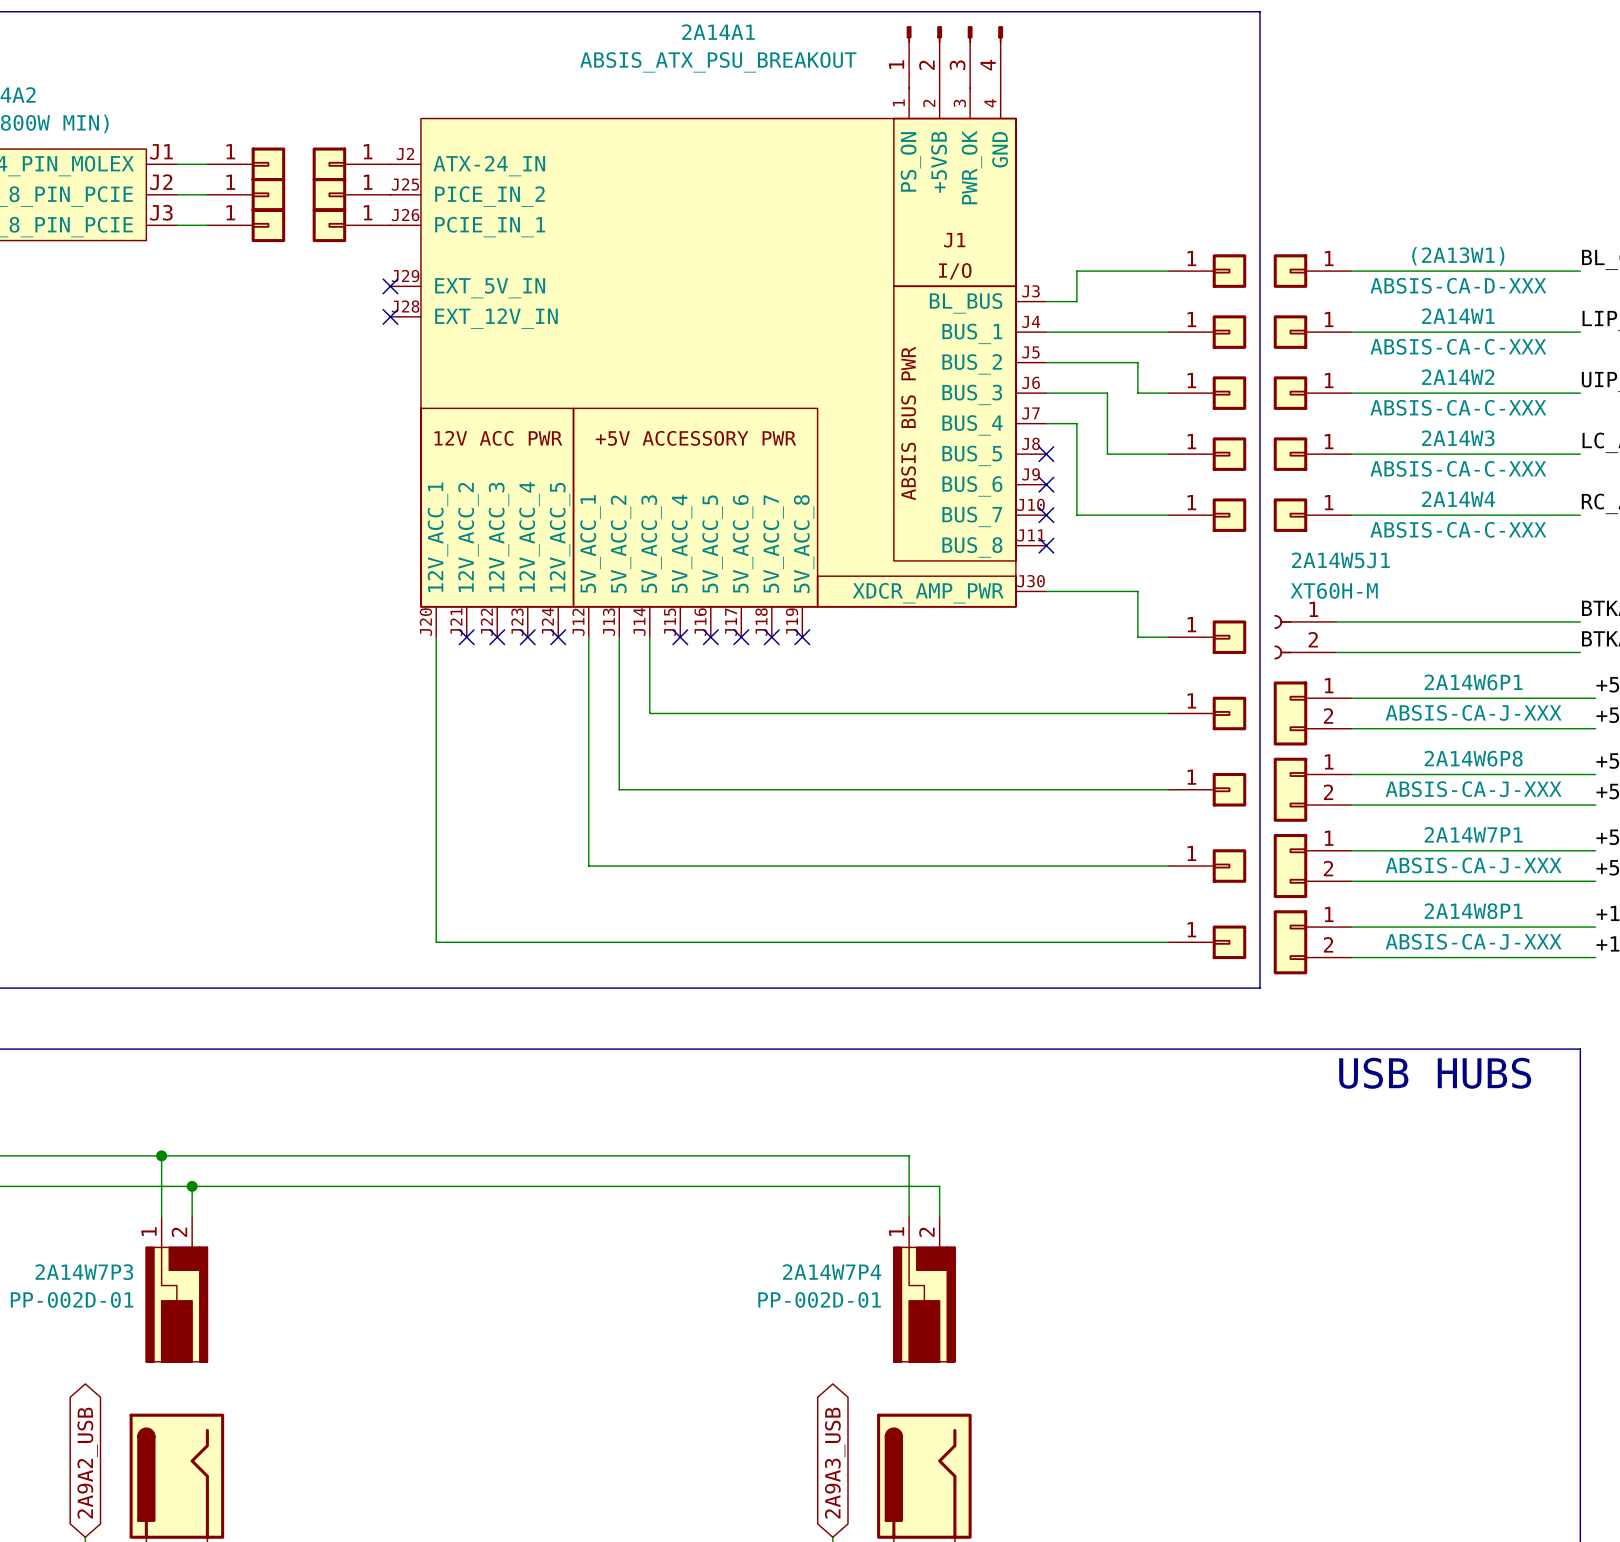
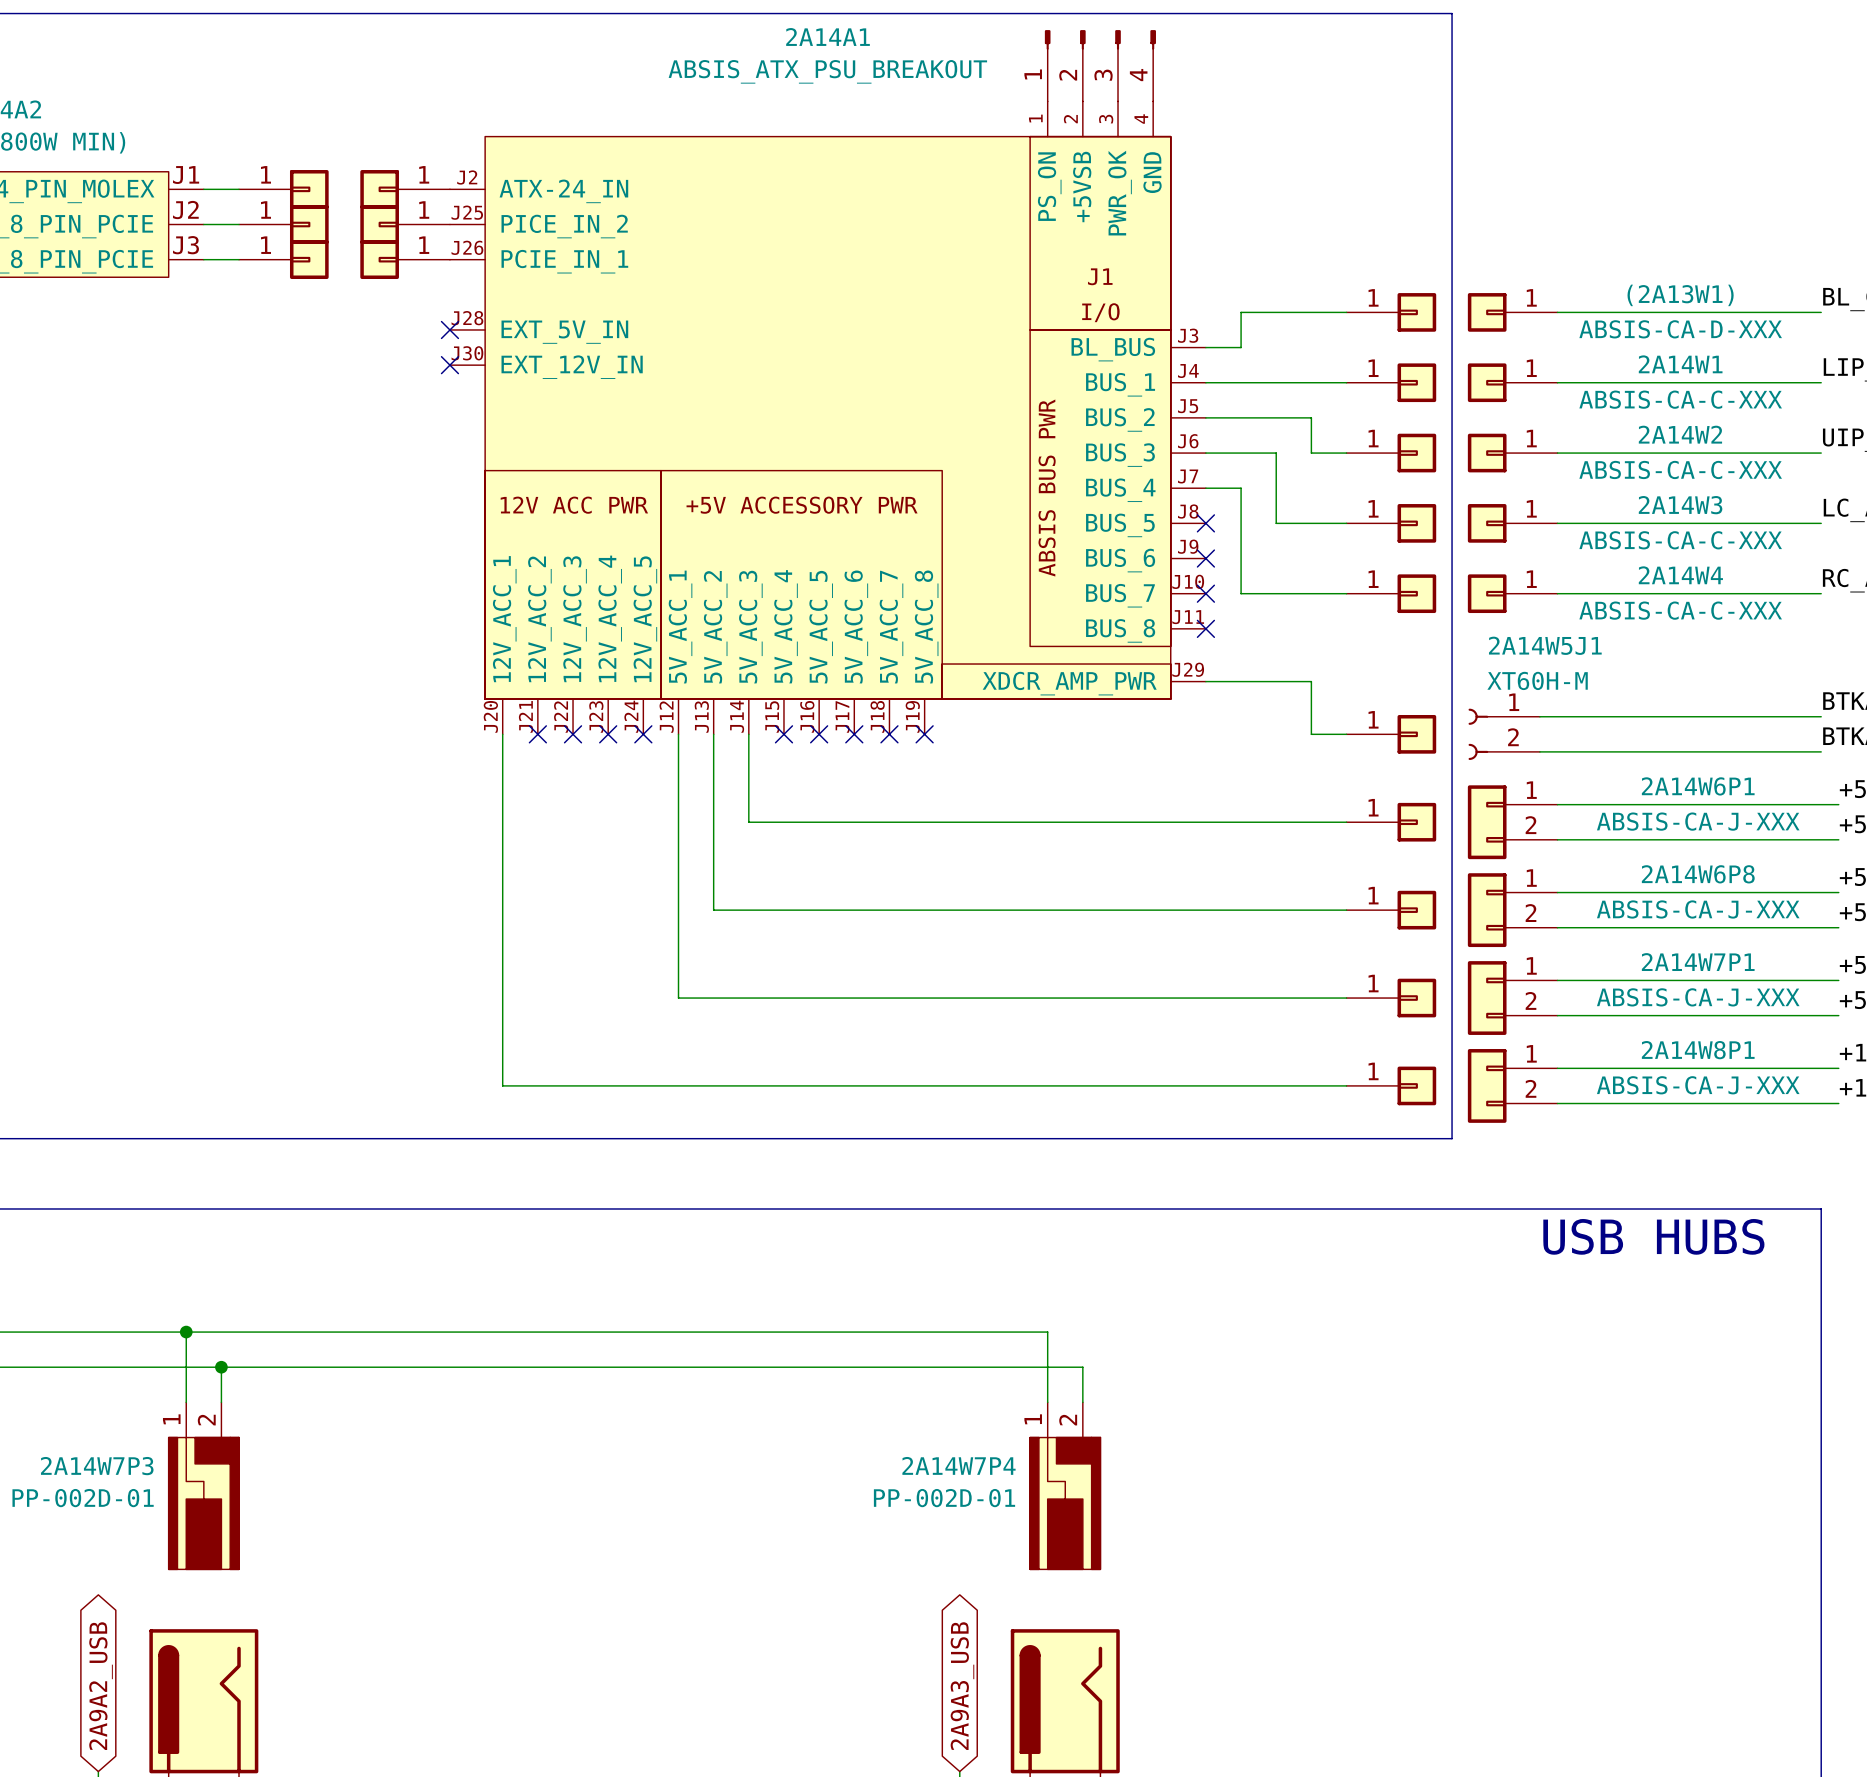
2A14A1 pin number: J29 (405, 276) -> J28 (467, 318)
2A14A1 pin number: J28 (405, 306) -> J30 (467, 353)
2A14A1 pin number: J30 (1031, 581) -> J29 (1188, 669)

